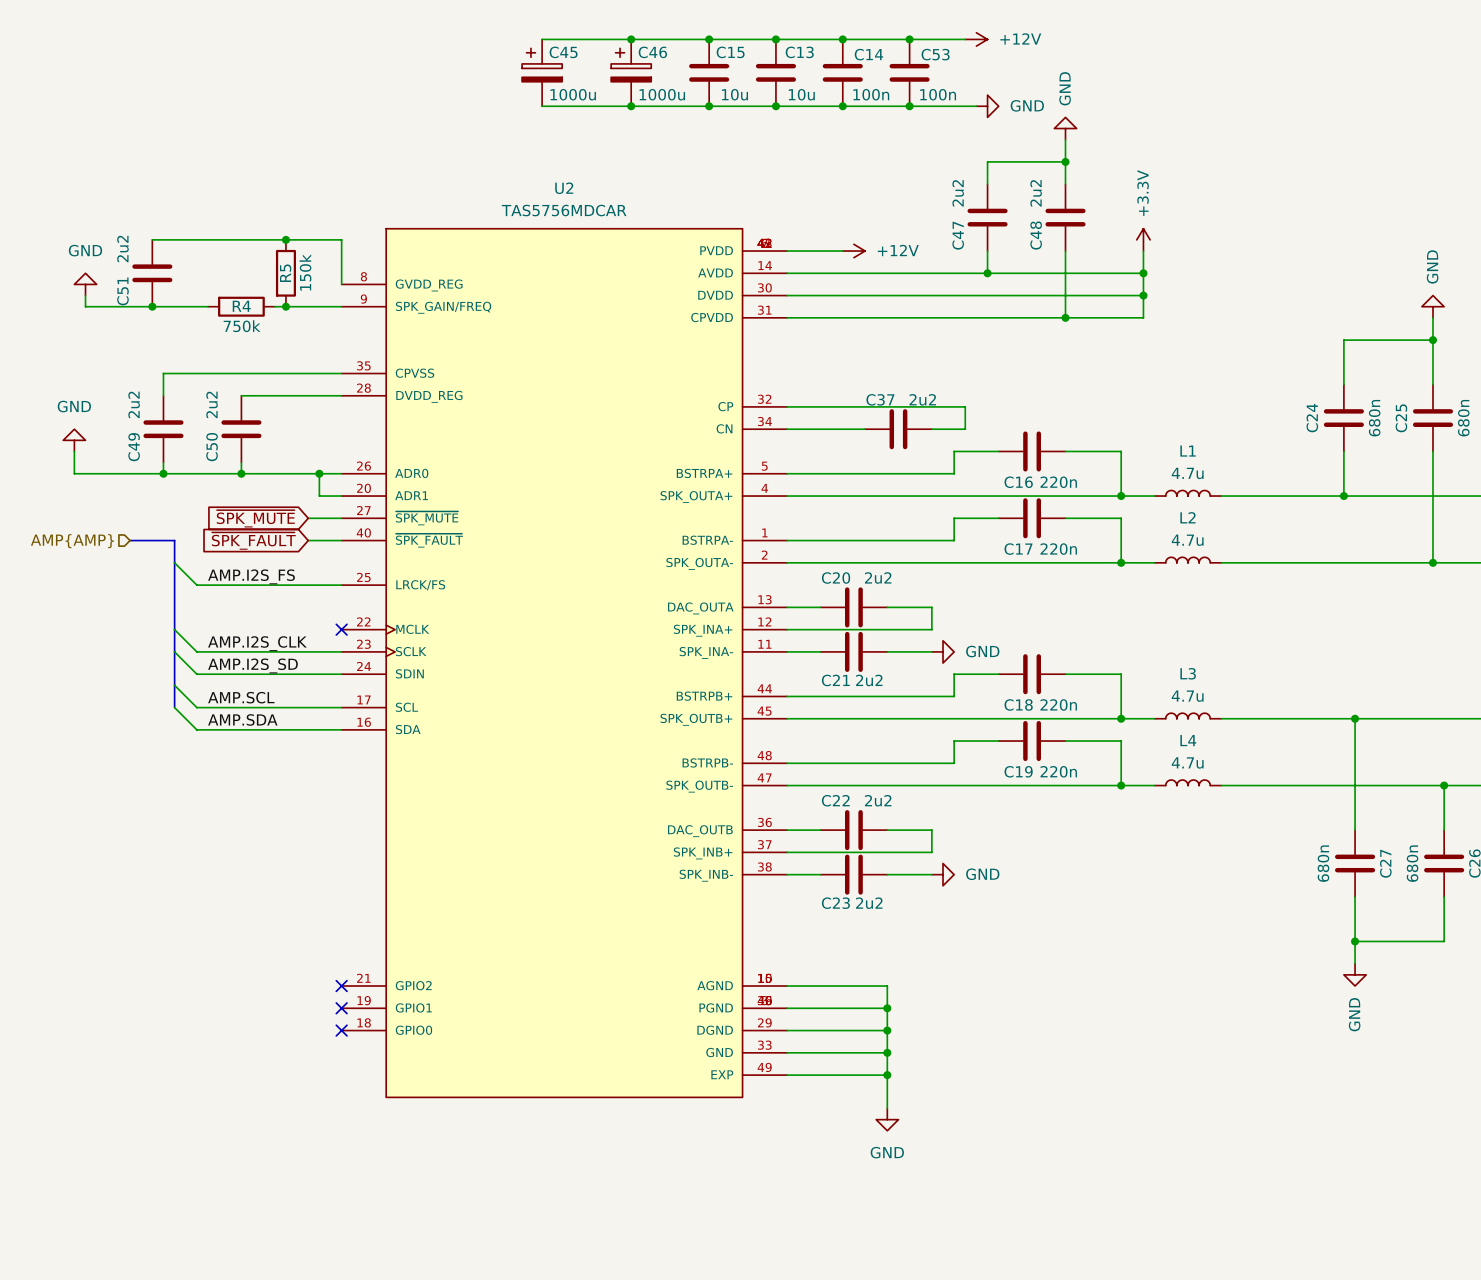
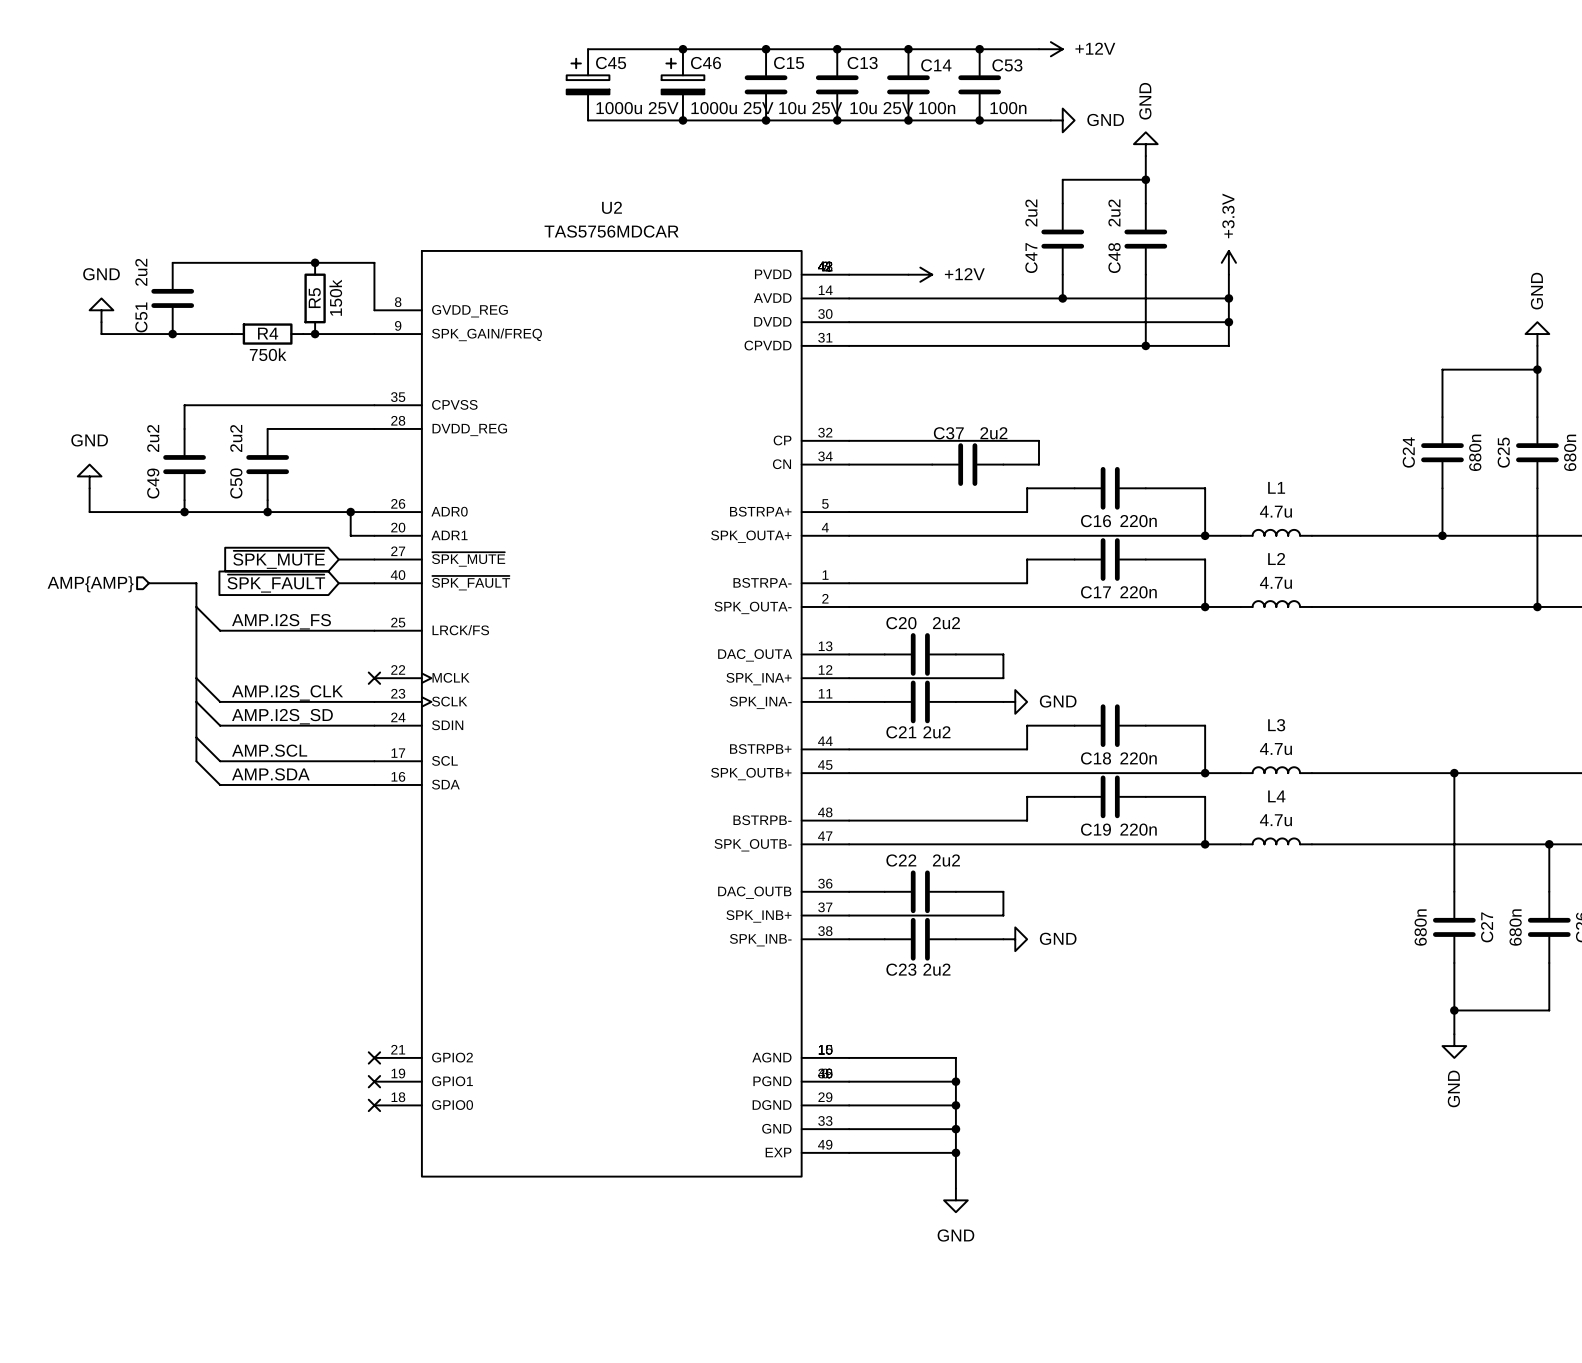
C45 value: 1000u (573, 94) -> 1000u 25V (637, 108)
C46 value: 1000u (662, 94) -> 1000u 25V (732, 108)
C15 value: 10u (734, 94) -> 10u 25V (810, 108)
C13 value: 10u (801, 94) -> 10u 25V (881, 108)

